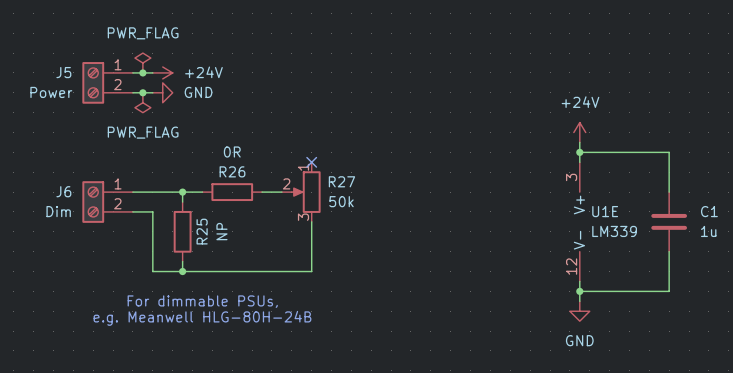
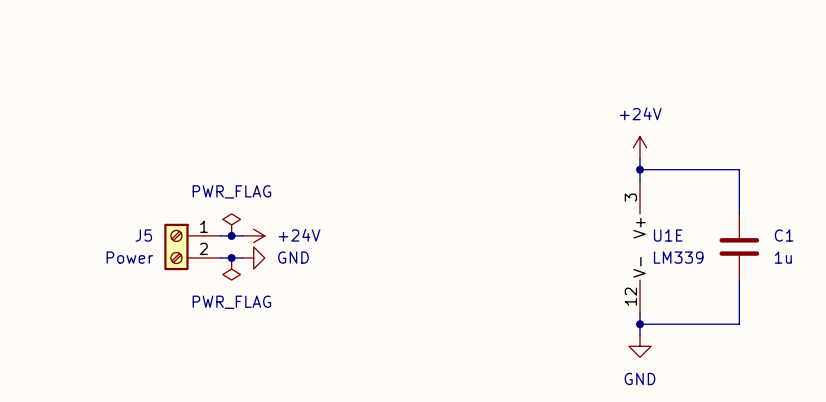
power symbol: PWR_FLAG (142, 63) -> none
wire: (132, 72) (152, 72) -> (220, 235) (242, 235)
junction: (142, 72) -> none
power symbol position: +24V (162, 72) -> +24V (253, 235)
J5 position: (107, 82) -> (192, 246)
wire: (132, 92) (152, 92) -> (220, 258) (242, 258)
junction: (142, 92) -> none
power symbol position: GND (162, 92) -> GND (253, 258)
power symbol: PWR_FLAG (142, 102) -> none
no-connect mark: (311, 162) -> none
wire: (132, 192) (202, 192) -> none
wire: (182, 192) (182, 202) -> none
junction: (182, 192) -> none
R26: 0R (232, 192) -> none
wire: (262, 192) (281, 192) -> none
R27: 50k (301, 192) -> none
J6: Dim (107, 202) -> none
power symbol: none -> PWR_FLAG (231, 224)
wire: (132, 211) (152, 211) (152, 271) (311, 271) (311, 221) -> none
junction: none -> (231, 235)
R25: NP (182, 231) -> none
junction: none -> (231, 258)
power symbol: none -> PWR_FLAG (231, 269)
wire: (182, 261) (182, 271) -> none
junction: (182, 271) -> none
text: For dimmable PSUs, (202, 301) -> none
text: e.g. Meanwell HLG-80H-24B (202, 318) -> none

